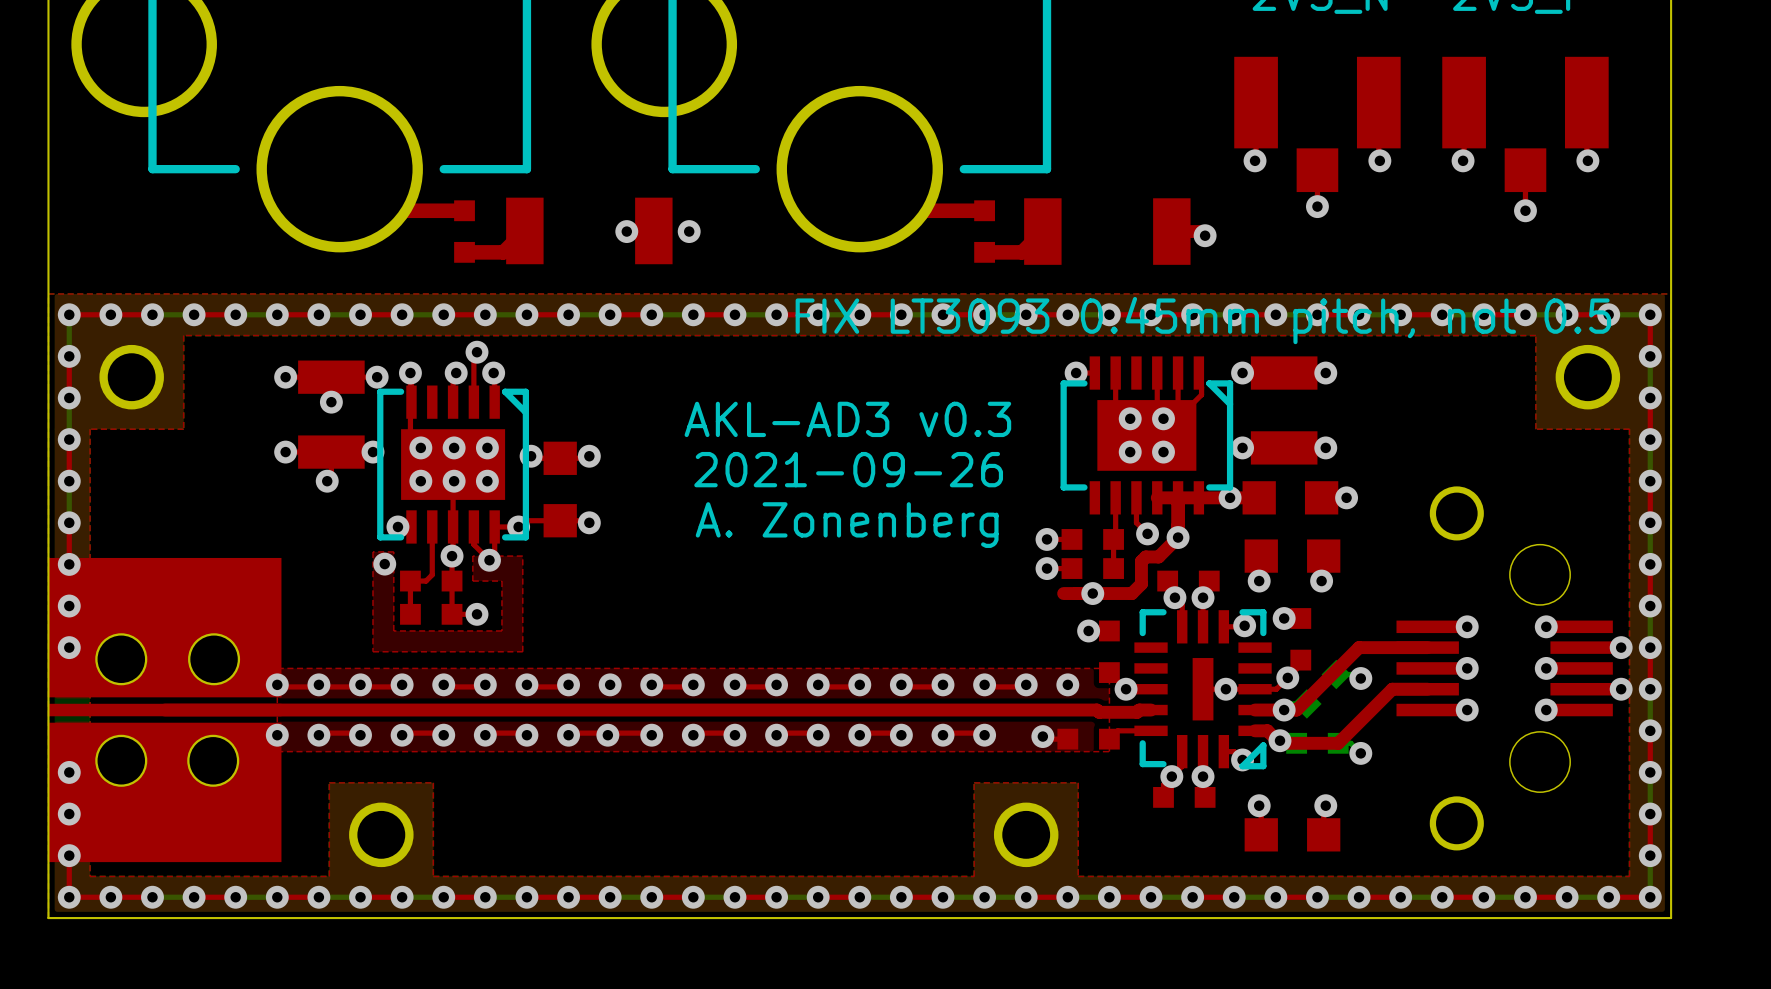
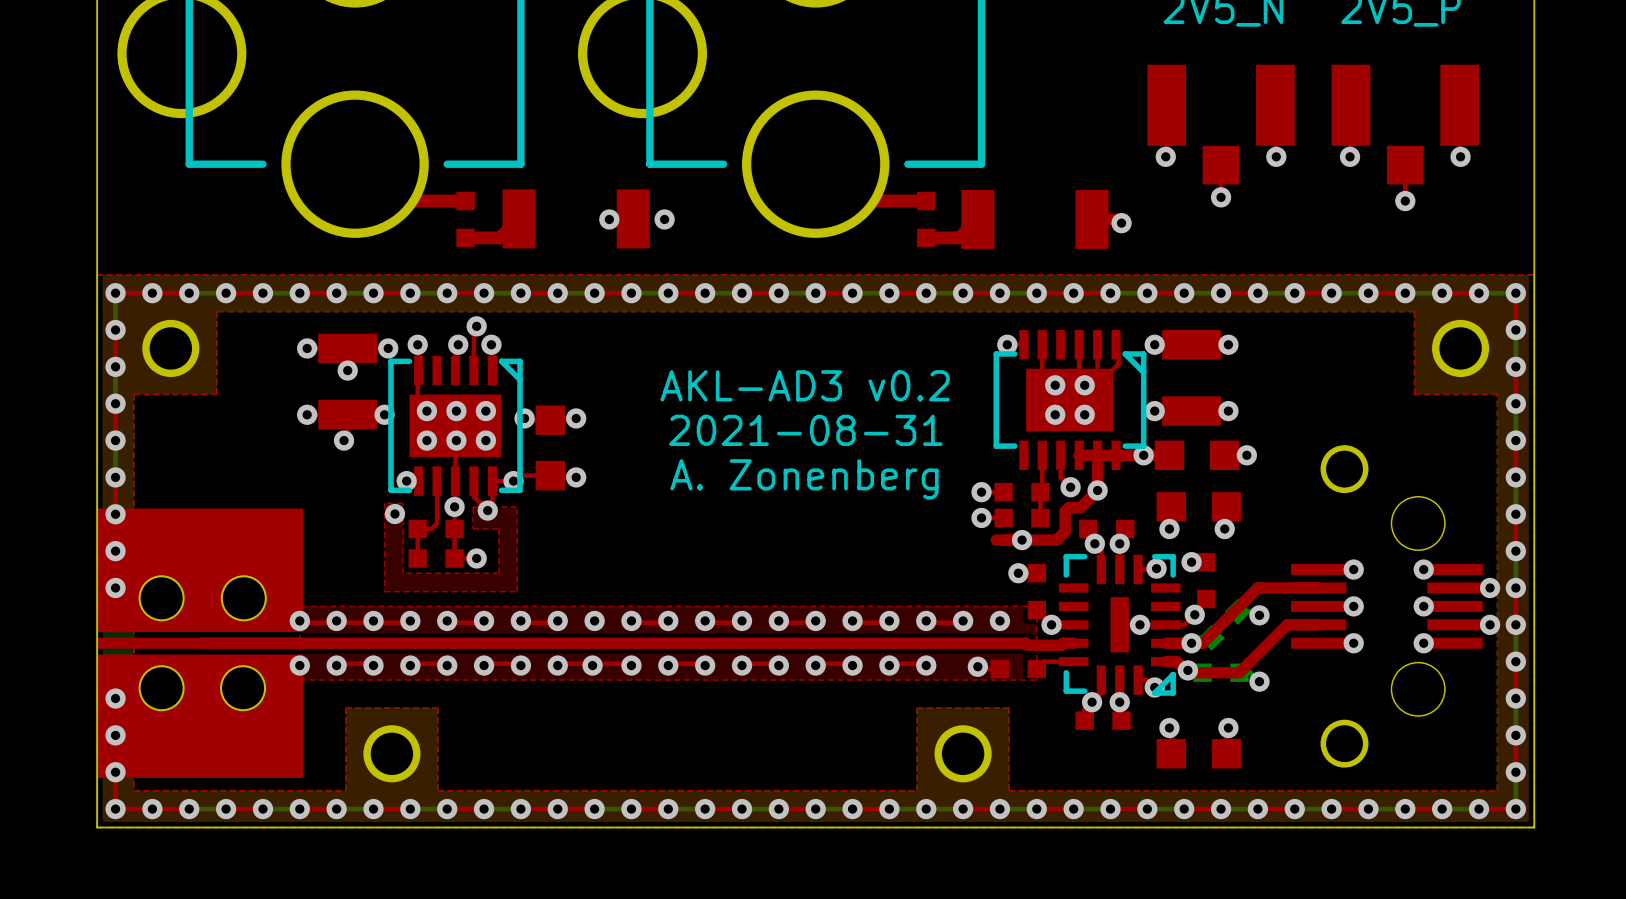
text: FIX LT3093 0.45mm pitch, not 0.5 (1203, 320) -> none
text: AKL-AD3 v0.3 (847, 419) -> AKL-AD3 v0.2 (805, 385)
text: 2021-09-26 (848, 469) -> 2021-08-31 (805, 430)

